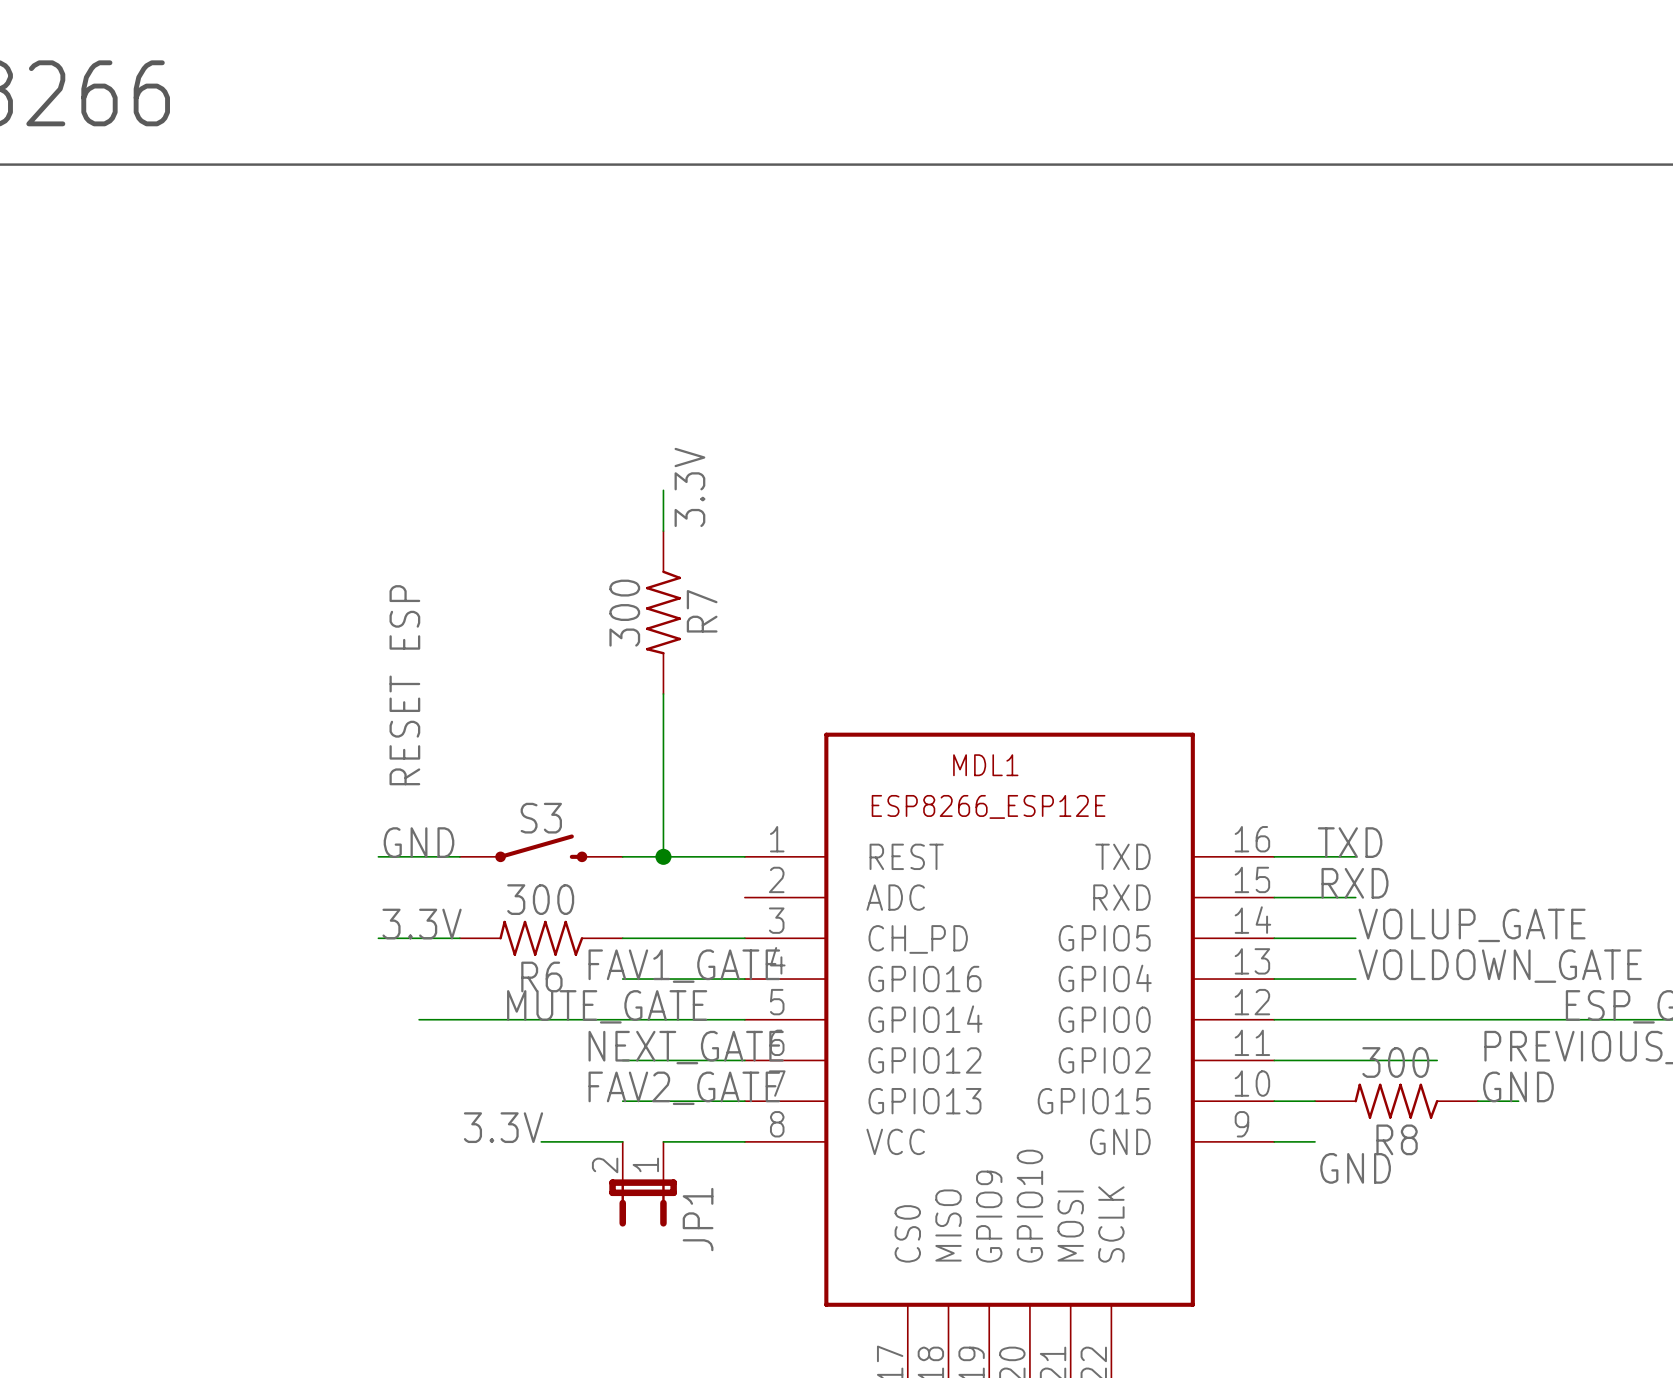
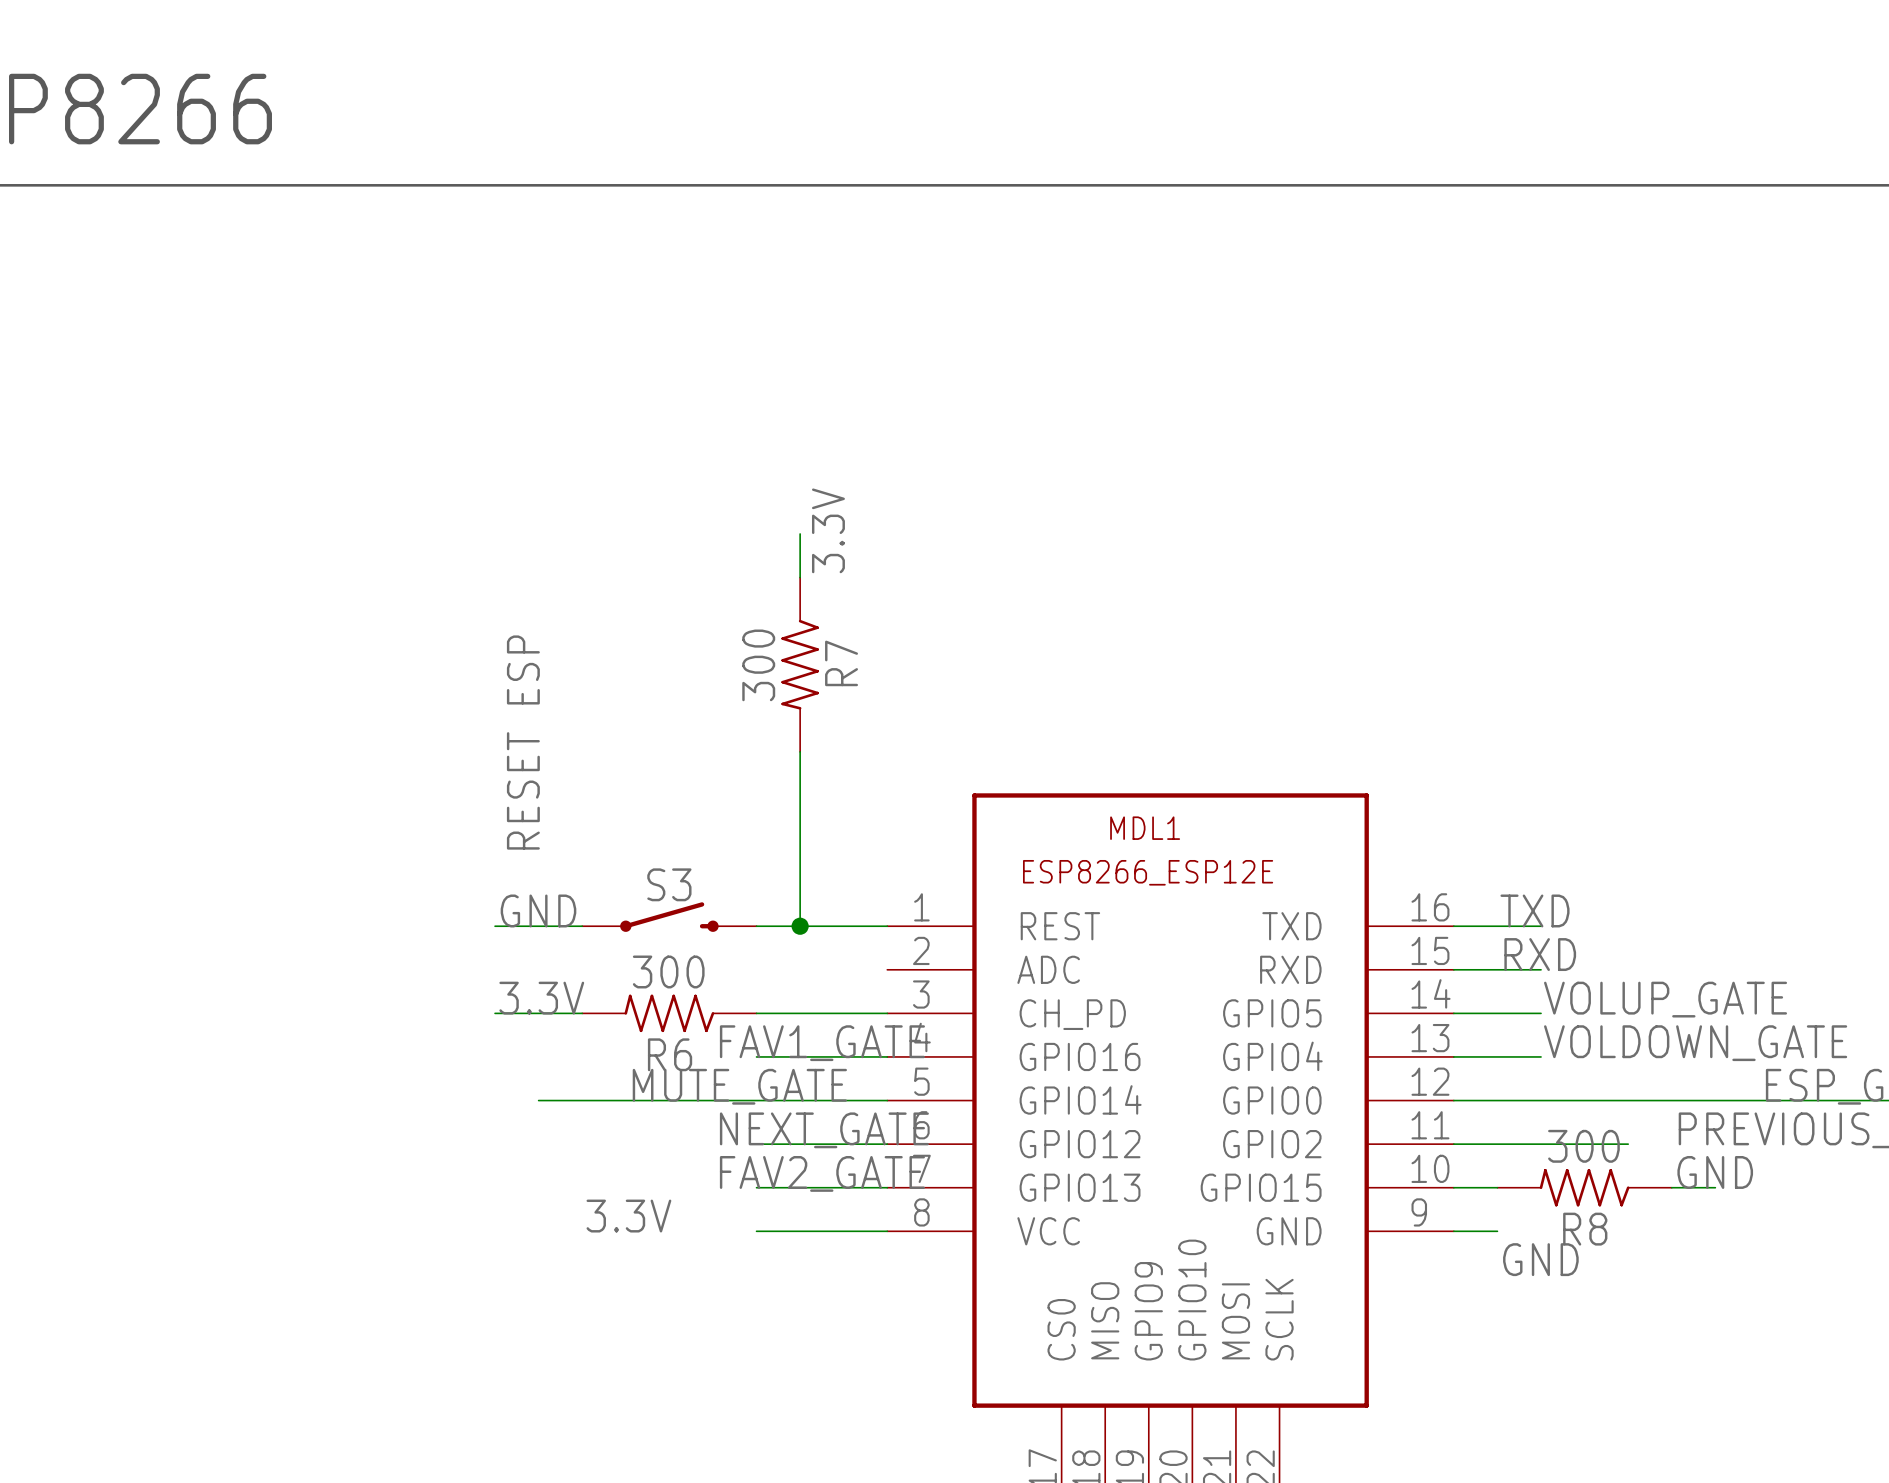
wire: (541, 1141) (622, 1141) -> (800, 1231) (756, 1231)
JP1: (643, 1184) -> none

